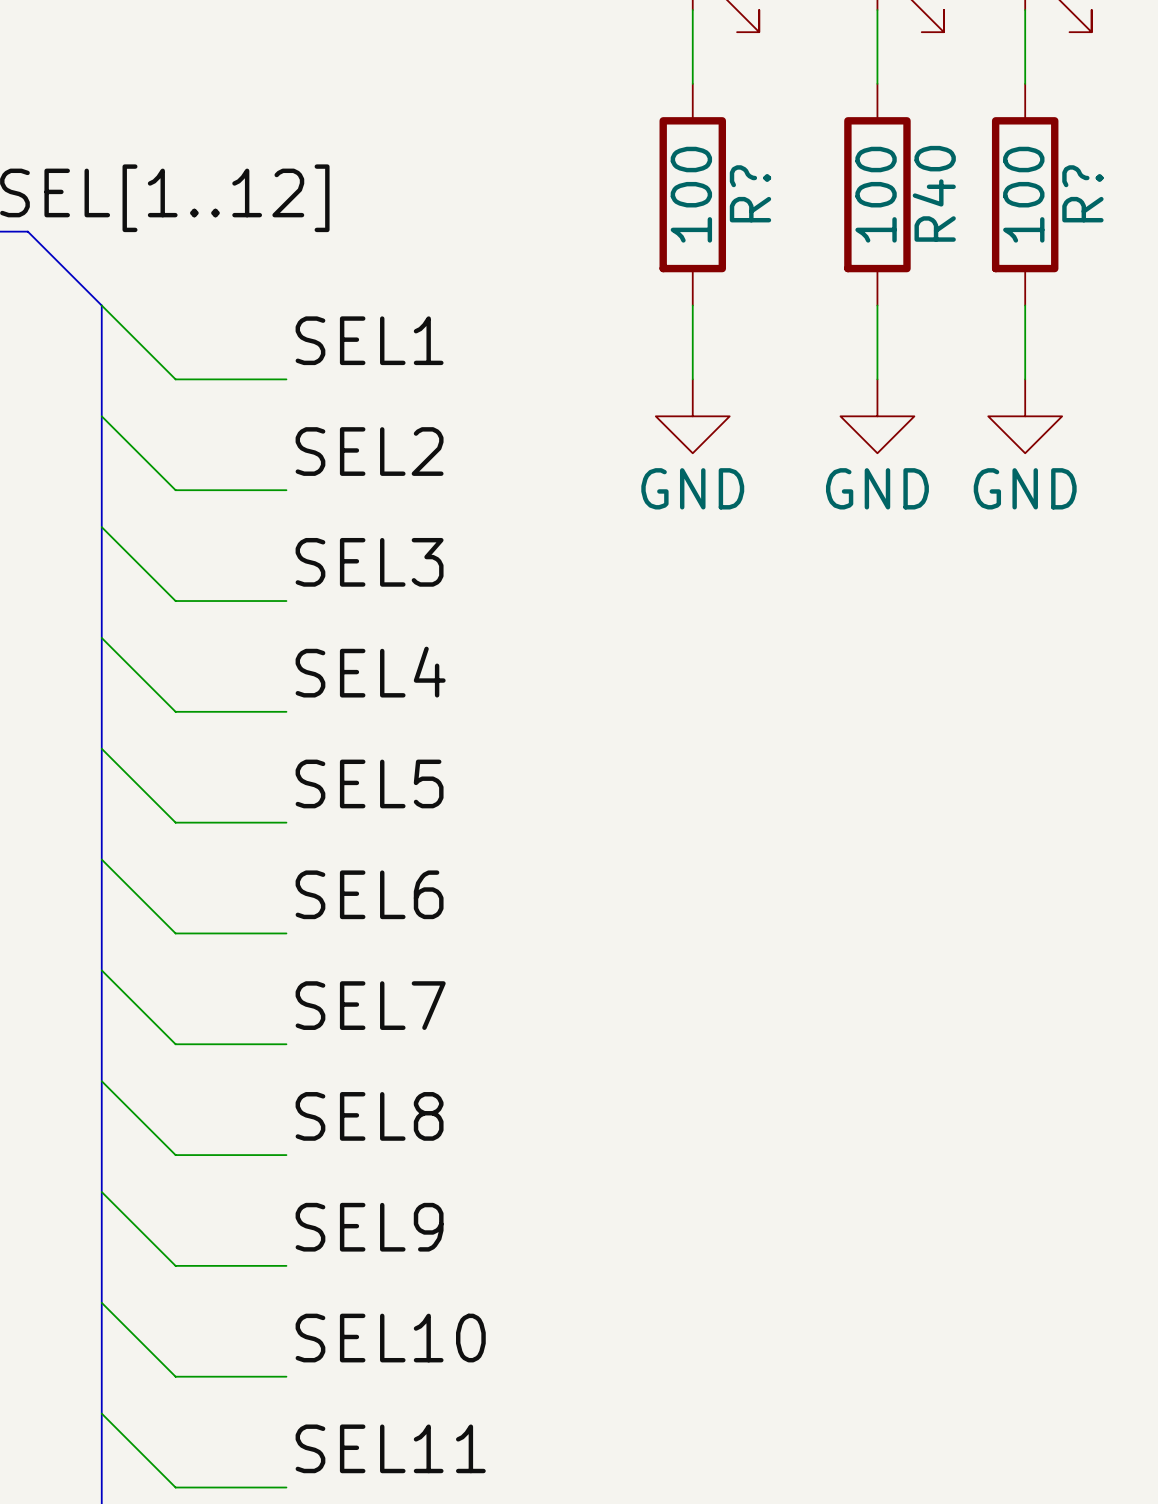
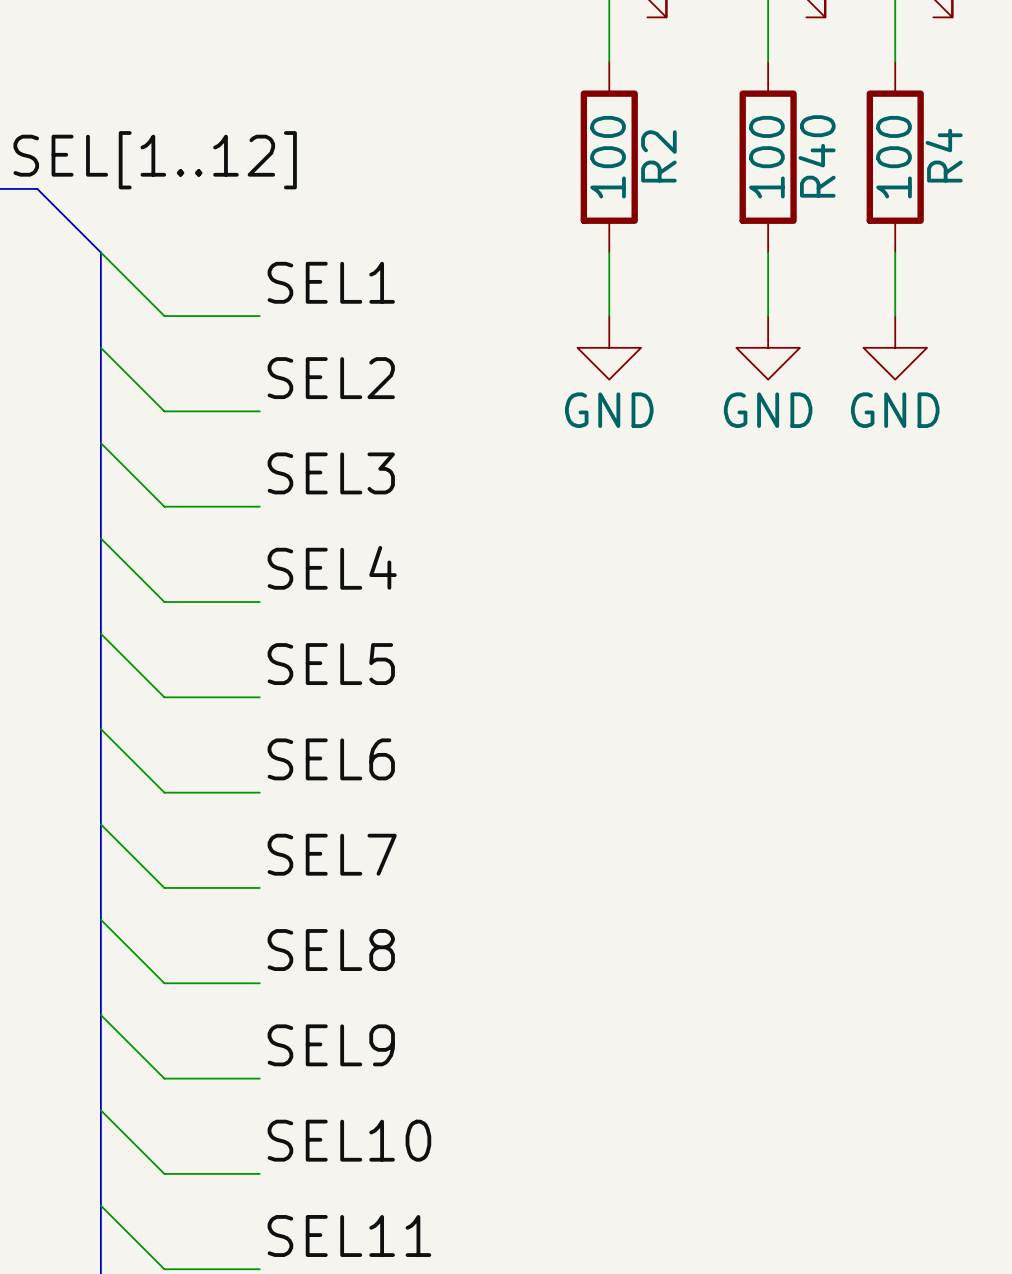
R? name: R? (750, 193) -> R2 (658, 156)
R? name: R? (1082, 193) -> R4 (944, 155)

